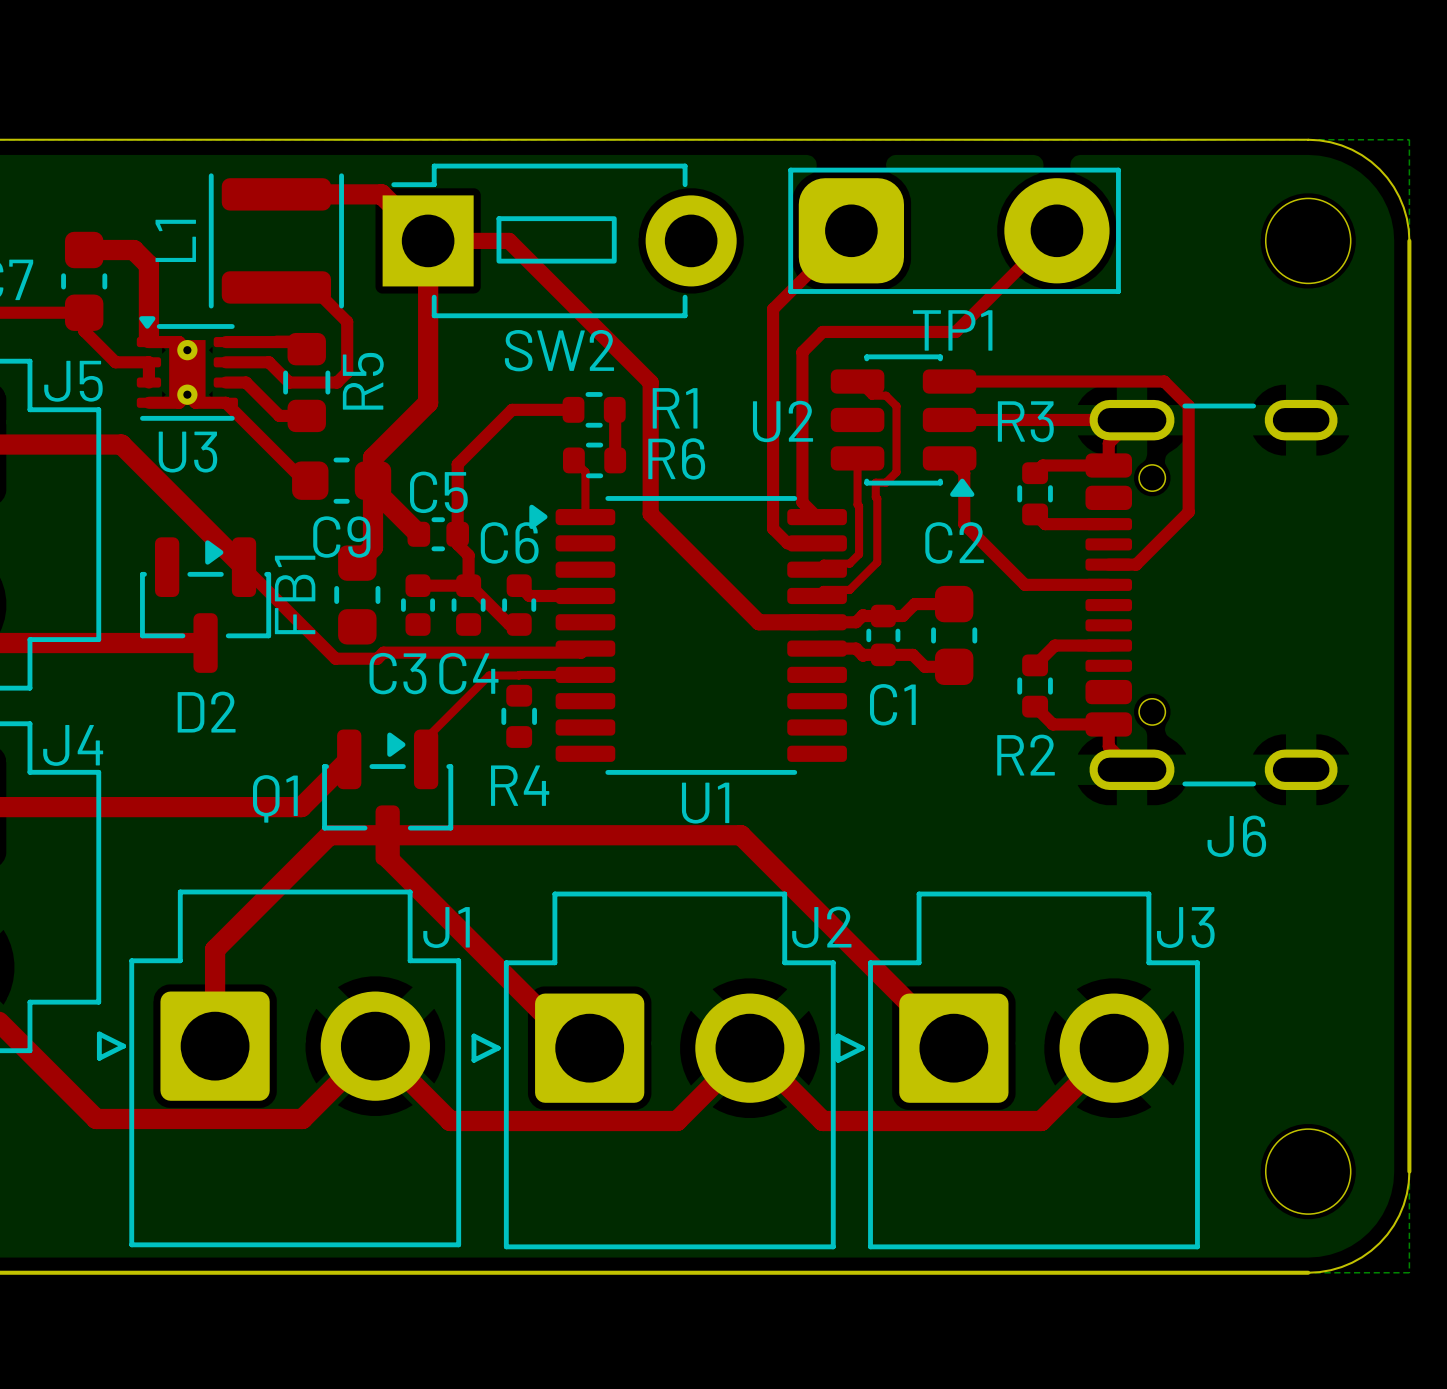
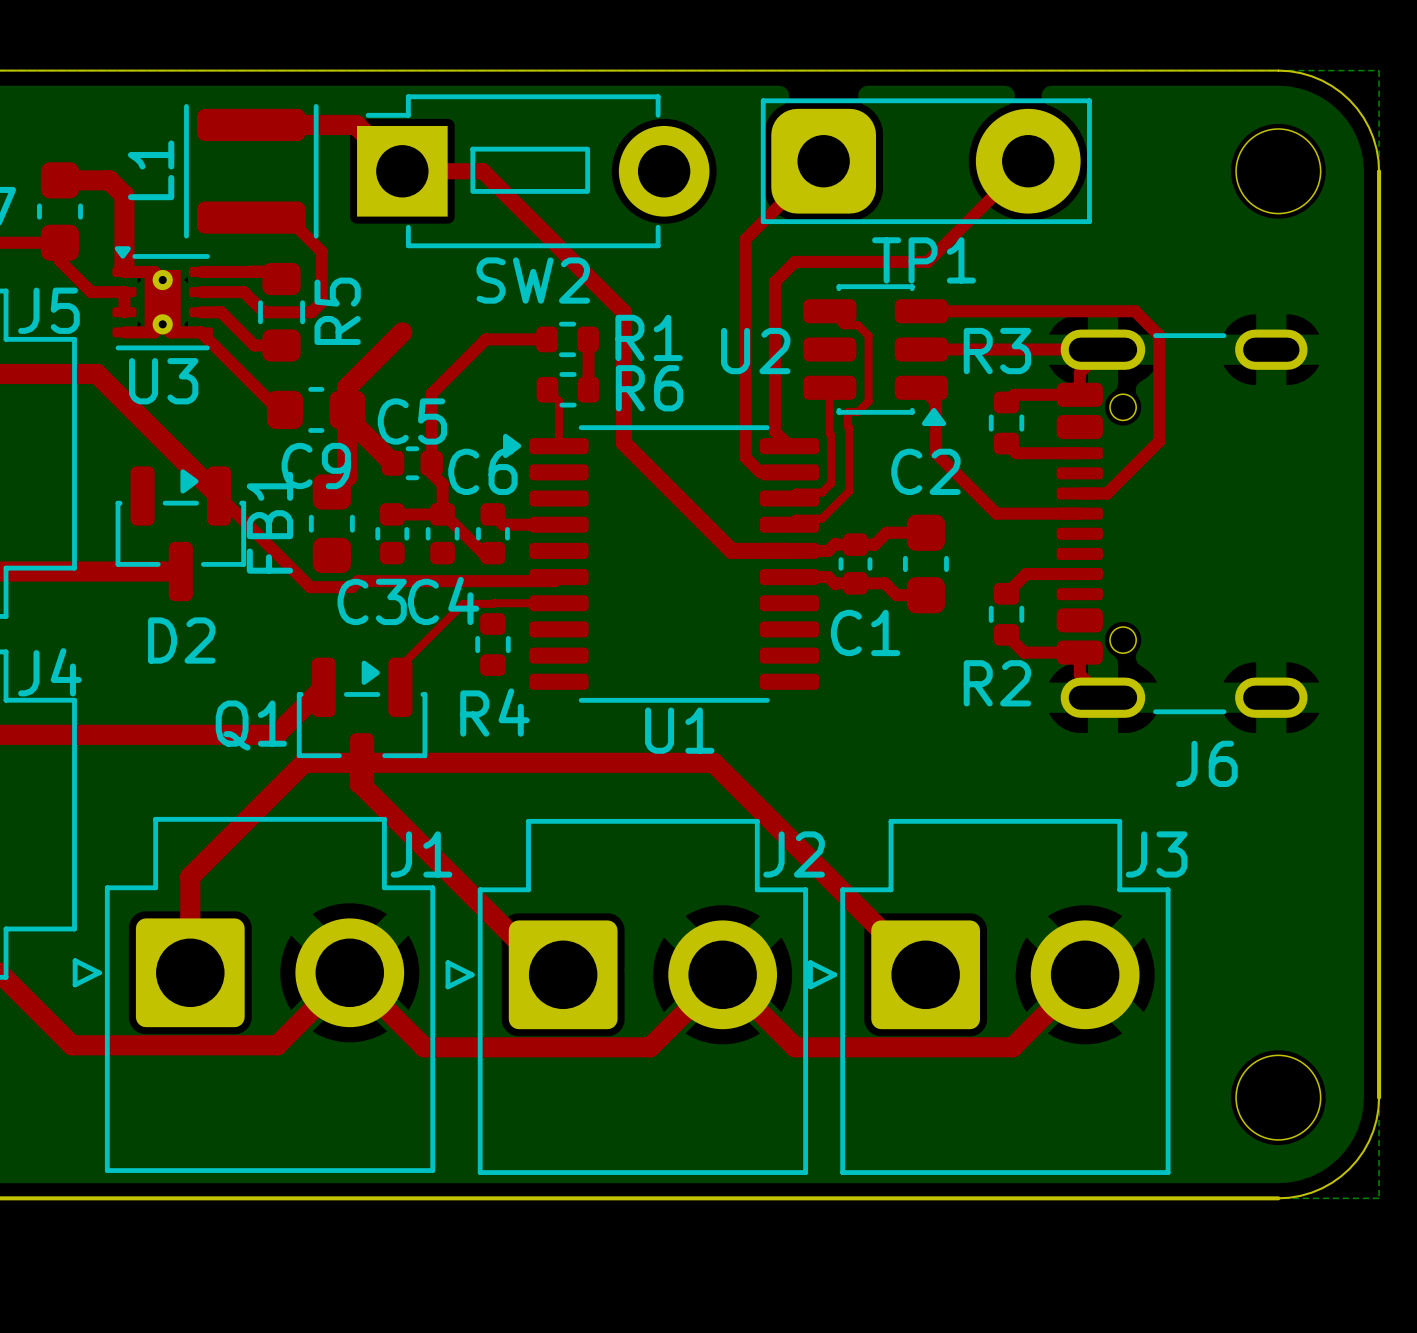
top track: (428, 240) (428, 402) -> none

